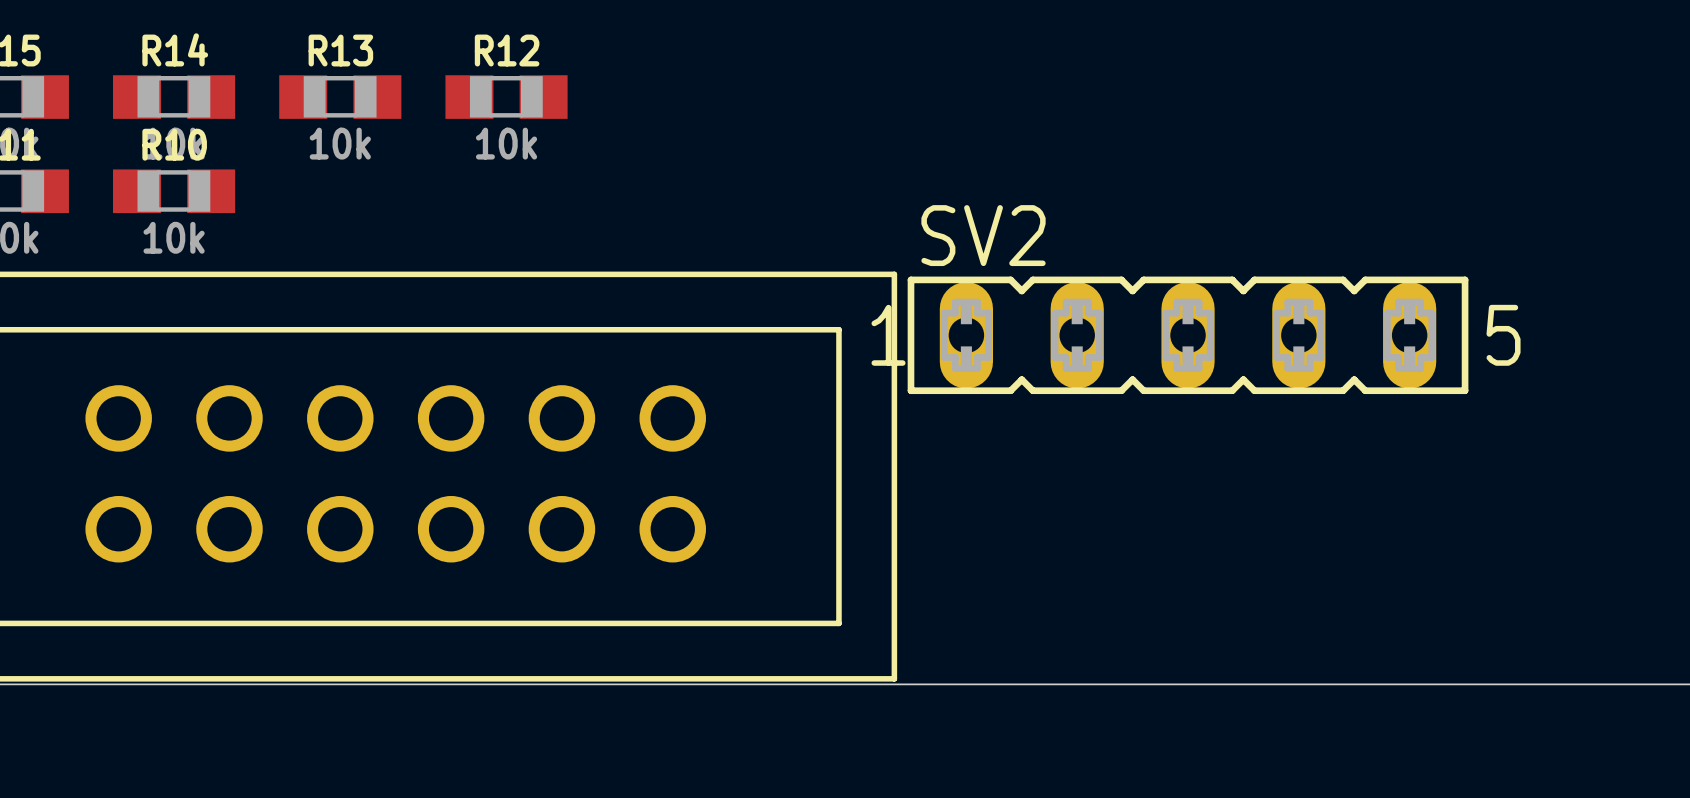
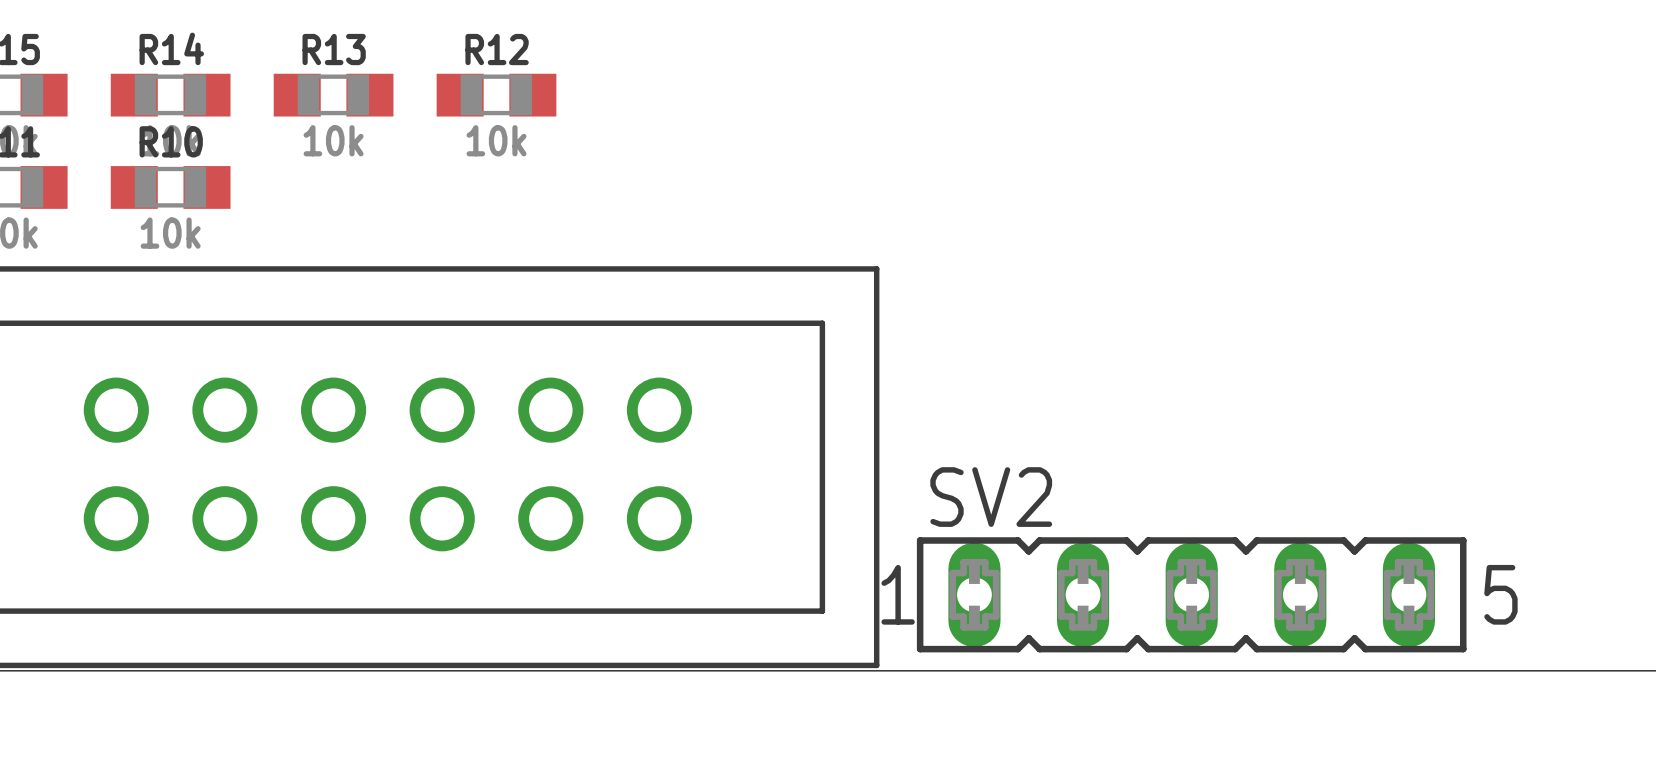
SV2 position: (1188, 335) -> (1191, 594)

